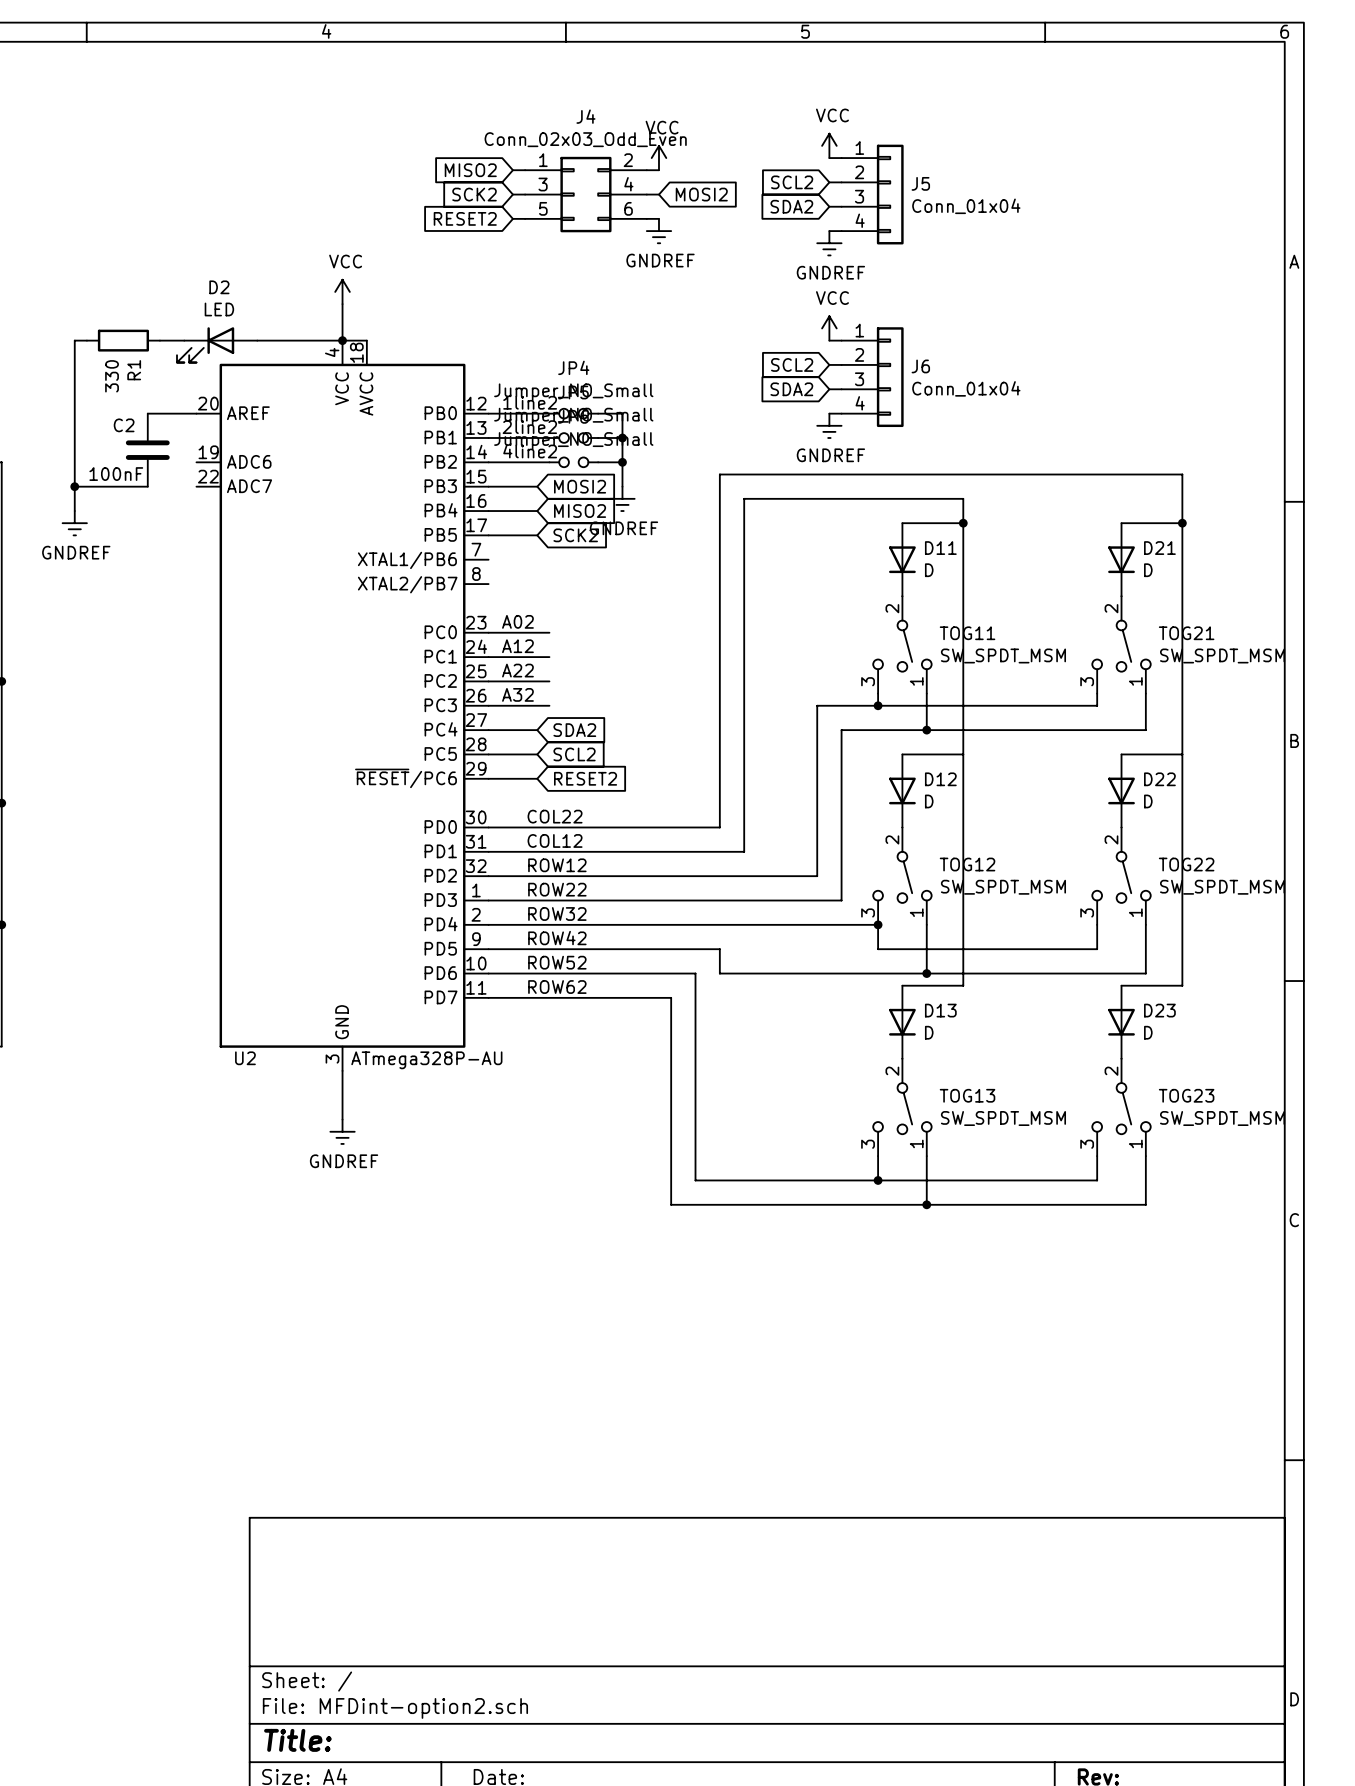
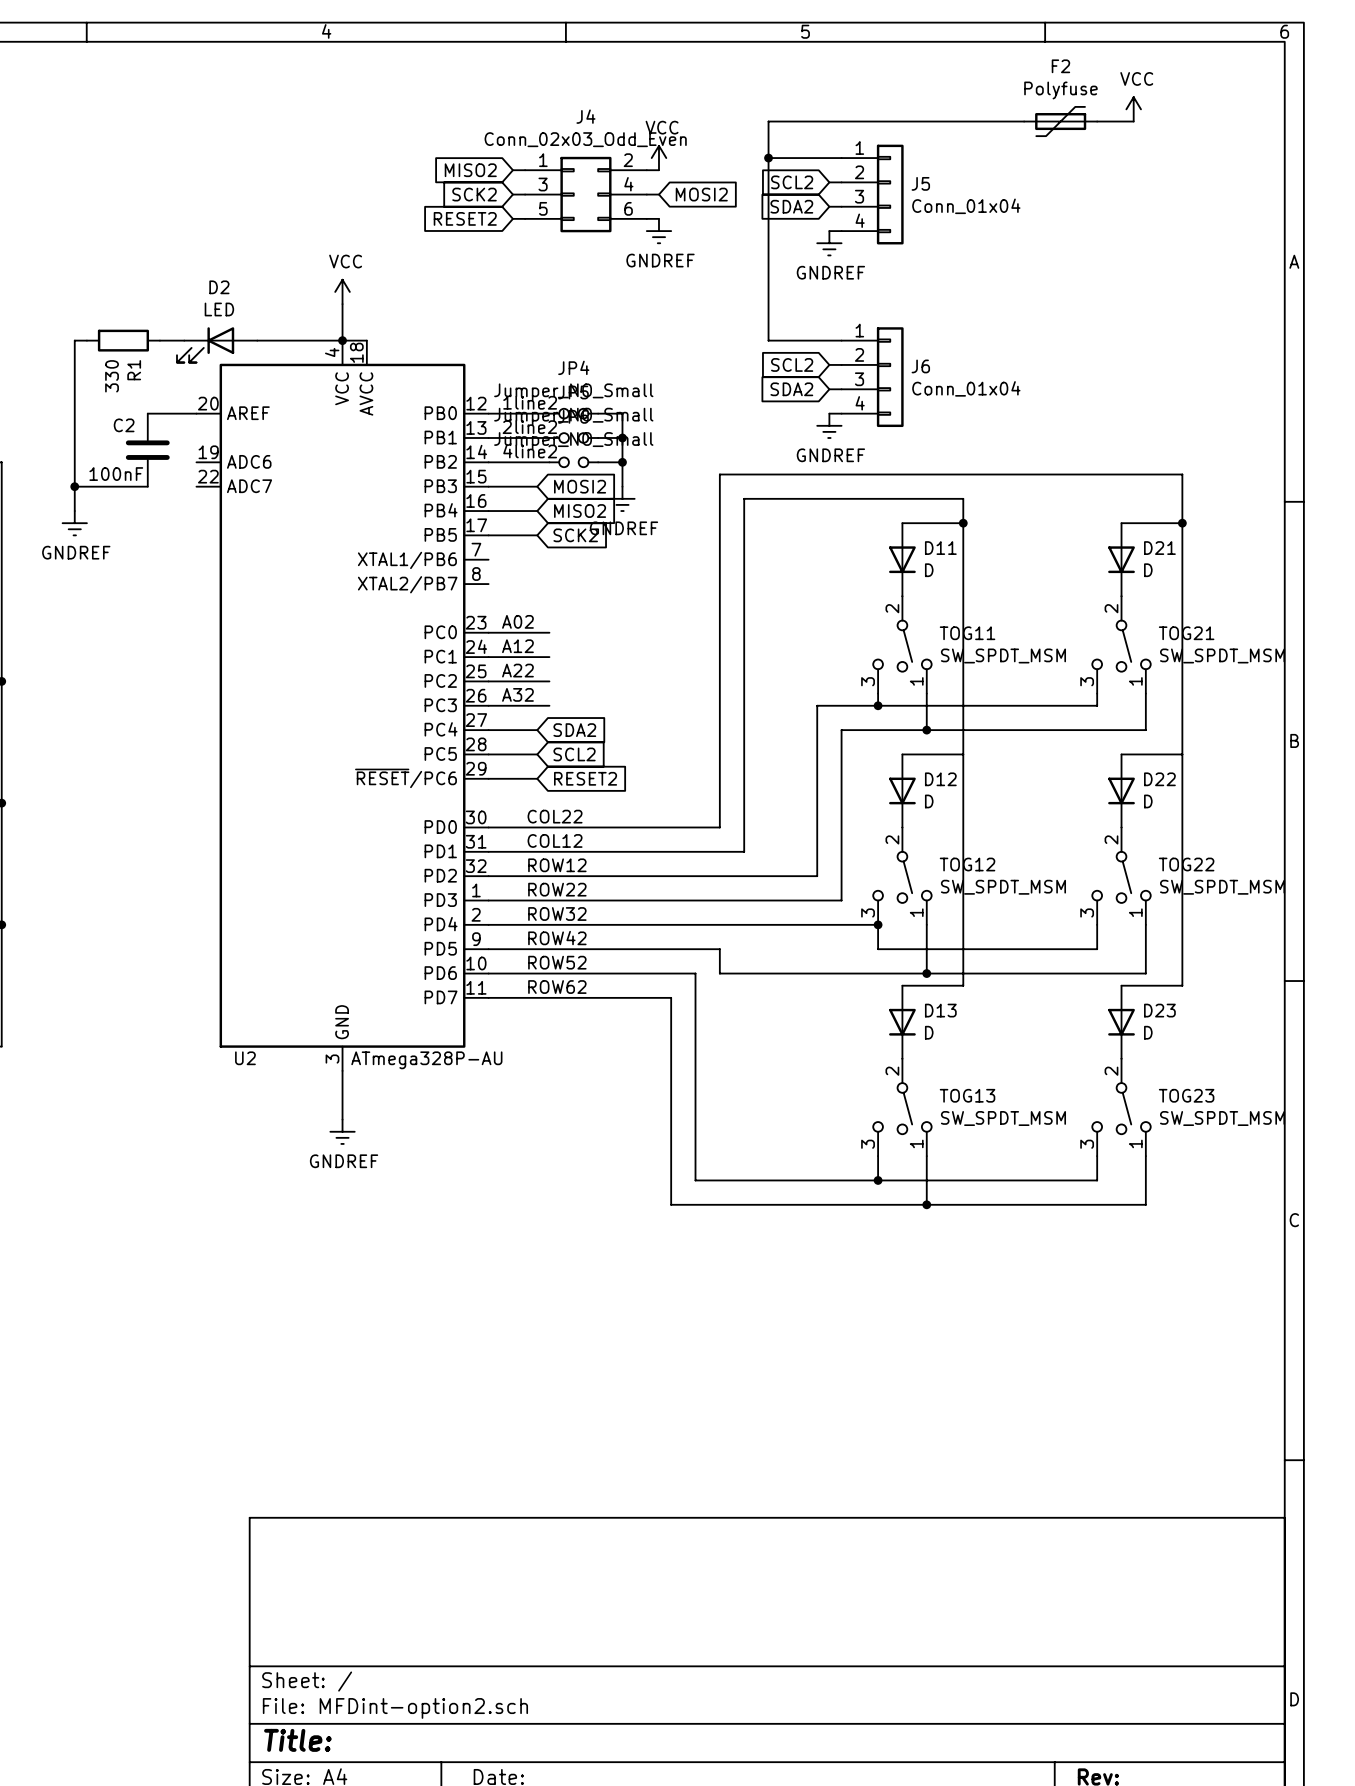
power symbol: none -> VCC (1133, 109)
wire: none -> (1024, 121) (768, 121) (768, 340) (829, 340)
F2: none -> Polyfuse (1060, 121)
wire: none -> (1097, 121) (1133, 121)
power symbol: VCC (829, 145) -> none
wire: none -> (768, 158) (829, 158)
junction: none -> (768, 158)
power symbol: VCC (829, 328) -> none

